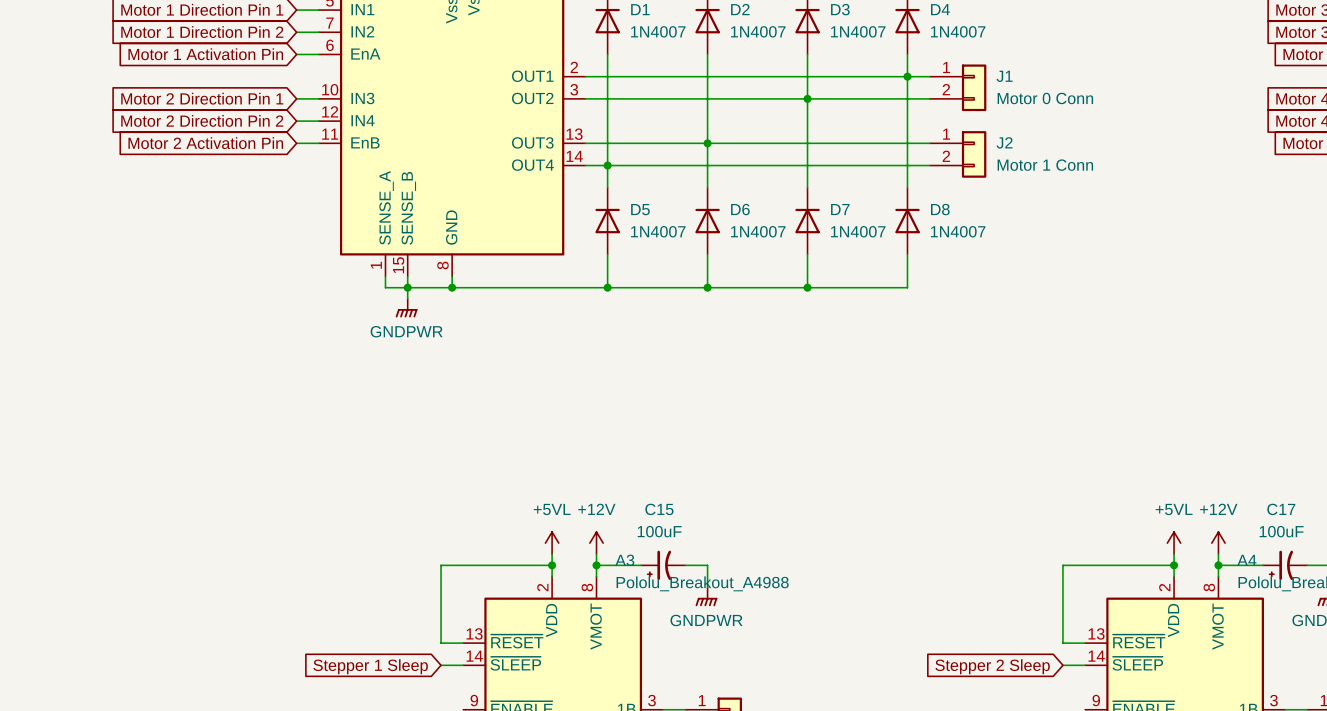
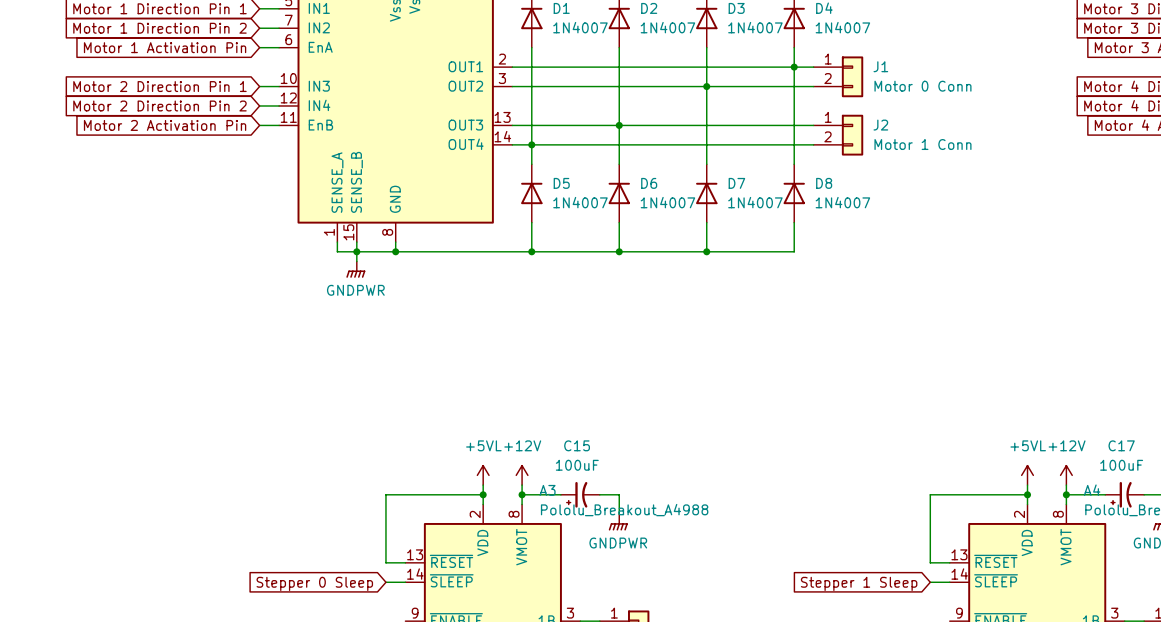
global label: Stepper 1 Sleep (370, 666) -> Stepper 0 Sleep (314, 583)
global label: Stepper 2 Sleep (992, 666) -> Stepper 1 Sleep (859, 583)

